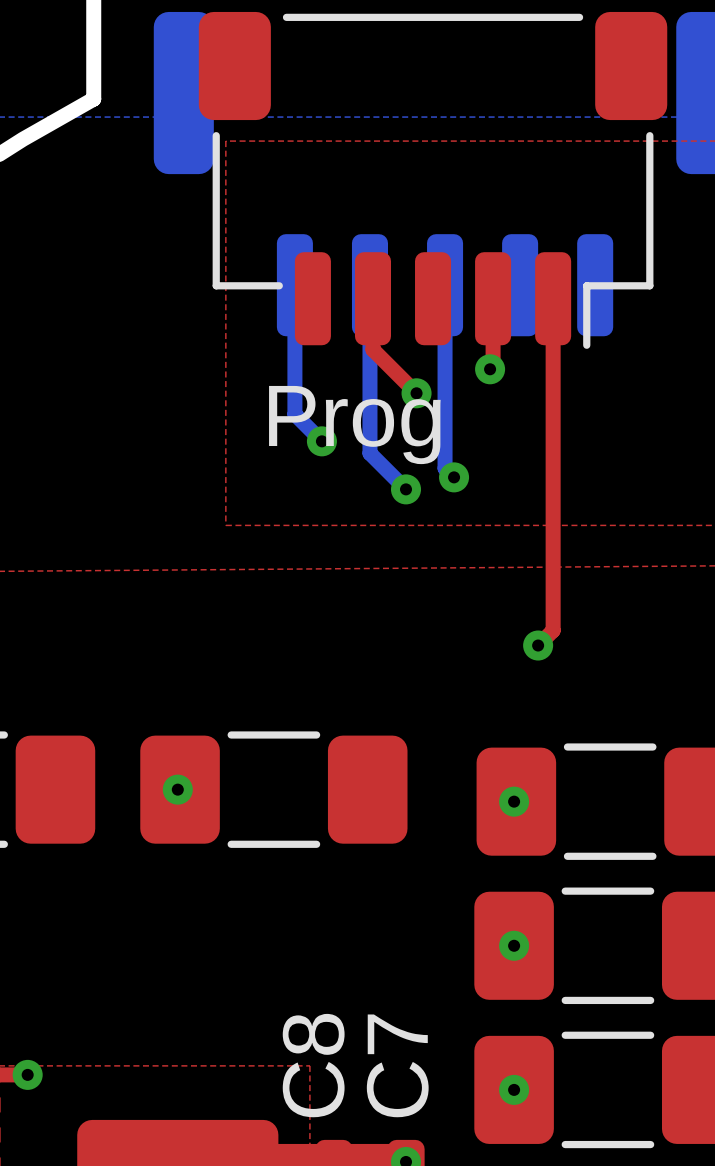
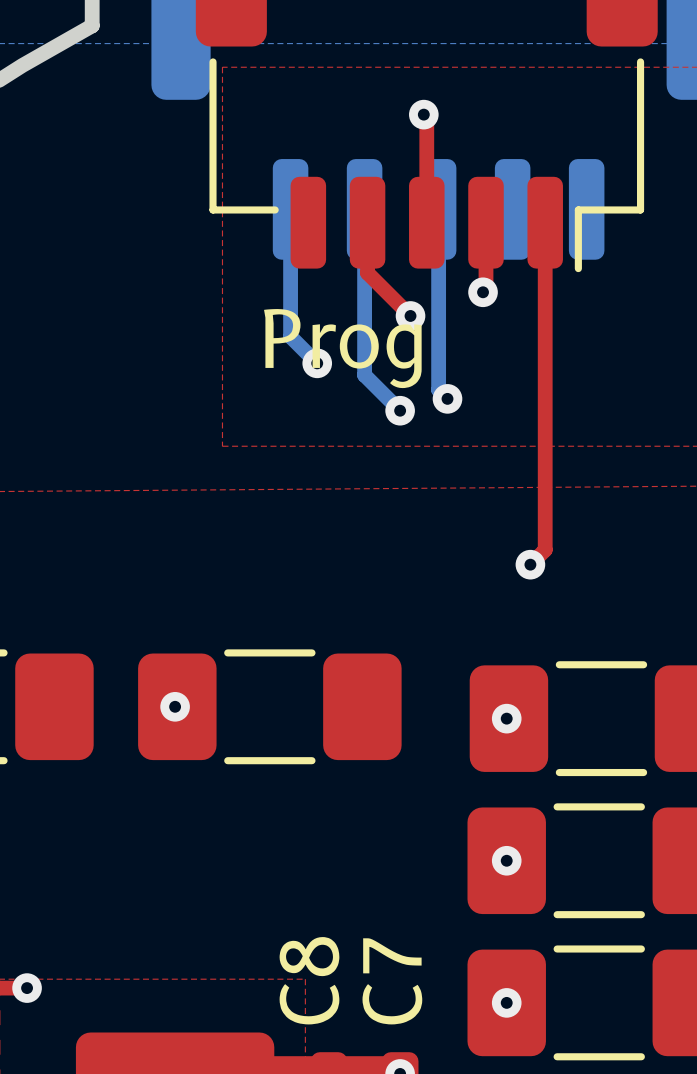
top track: none -> (423, 114) (426, 117) (426, 222)
via: none -> (423, 114)

